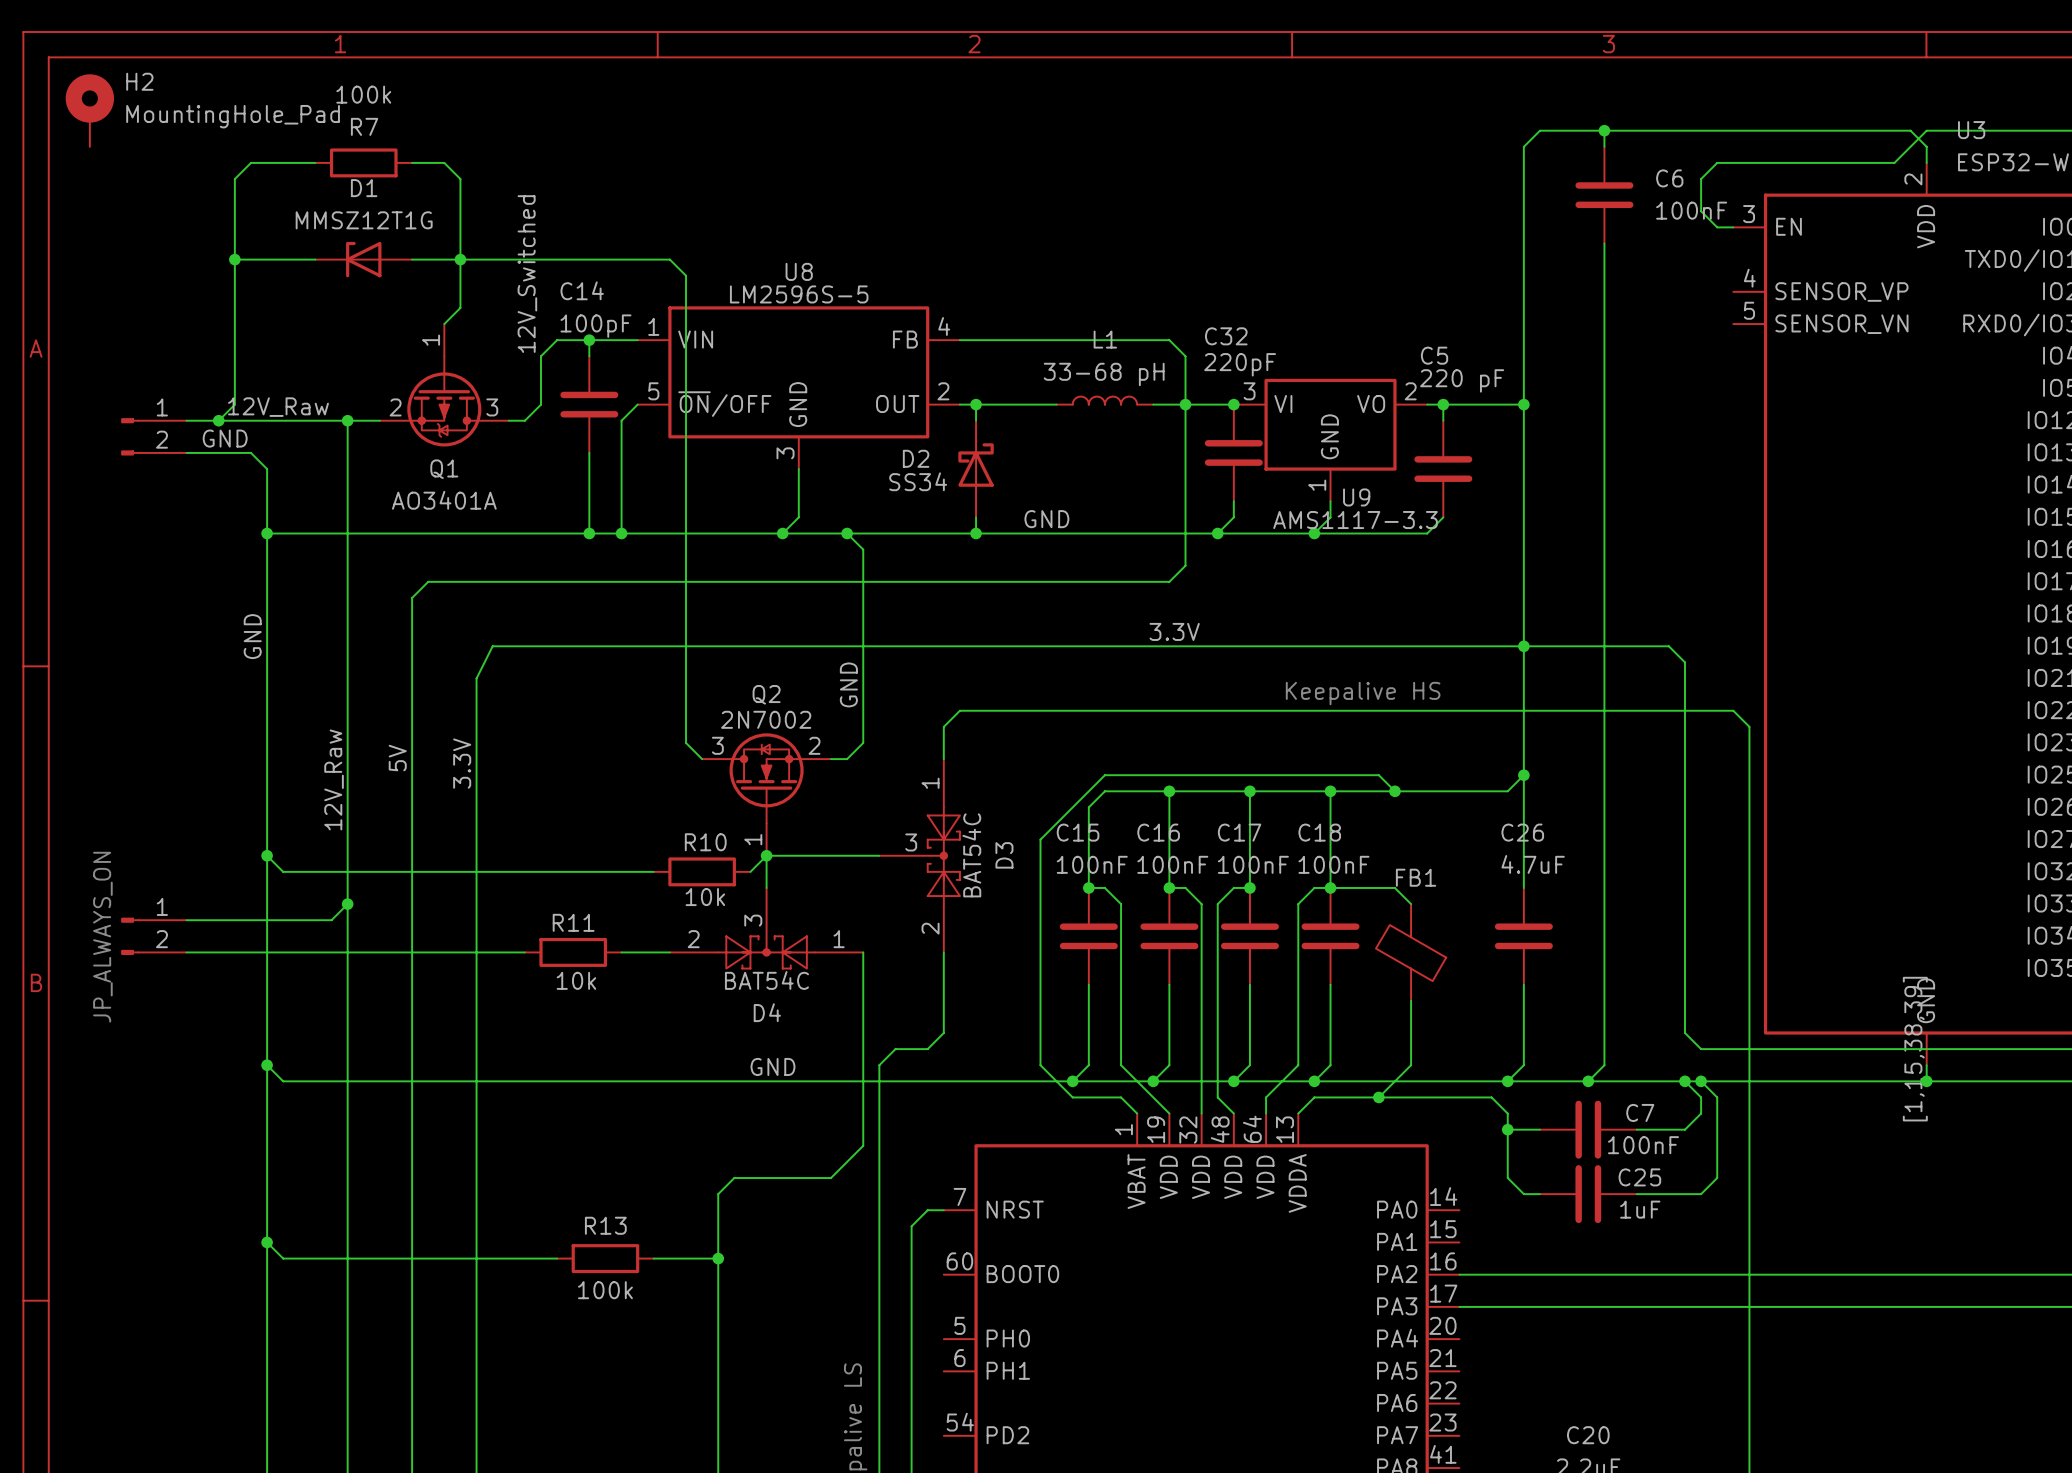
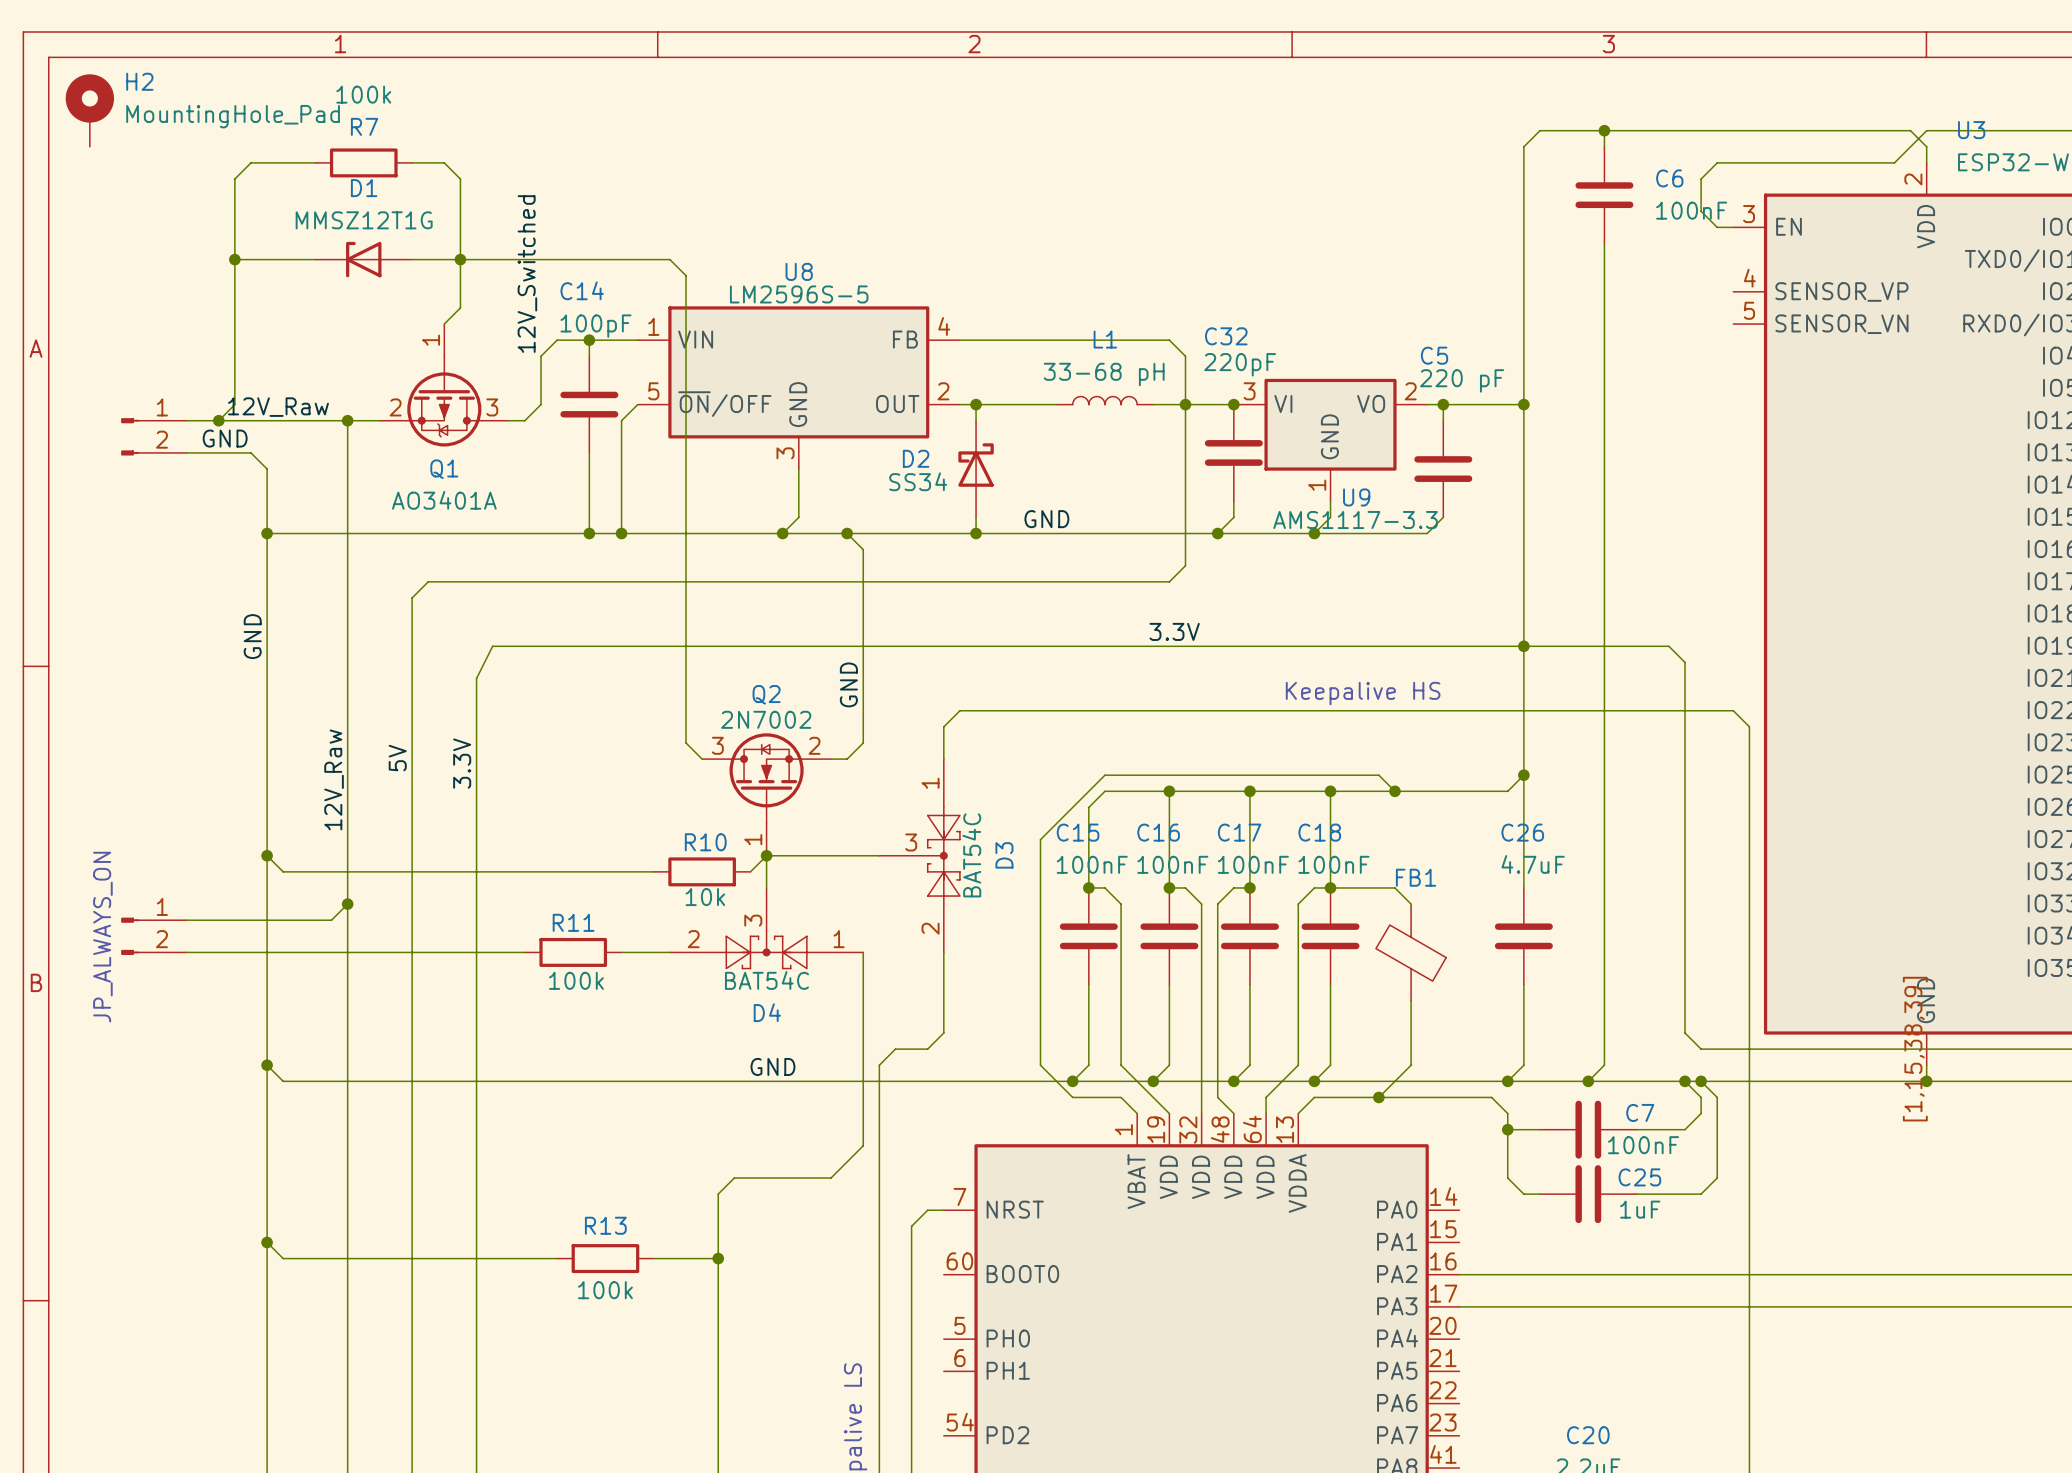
R11 value: 10k (576, 980) -> 100k (576, 980)

